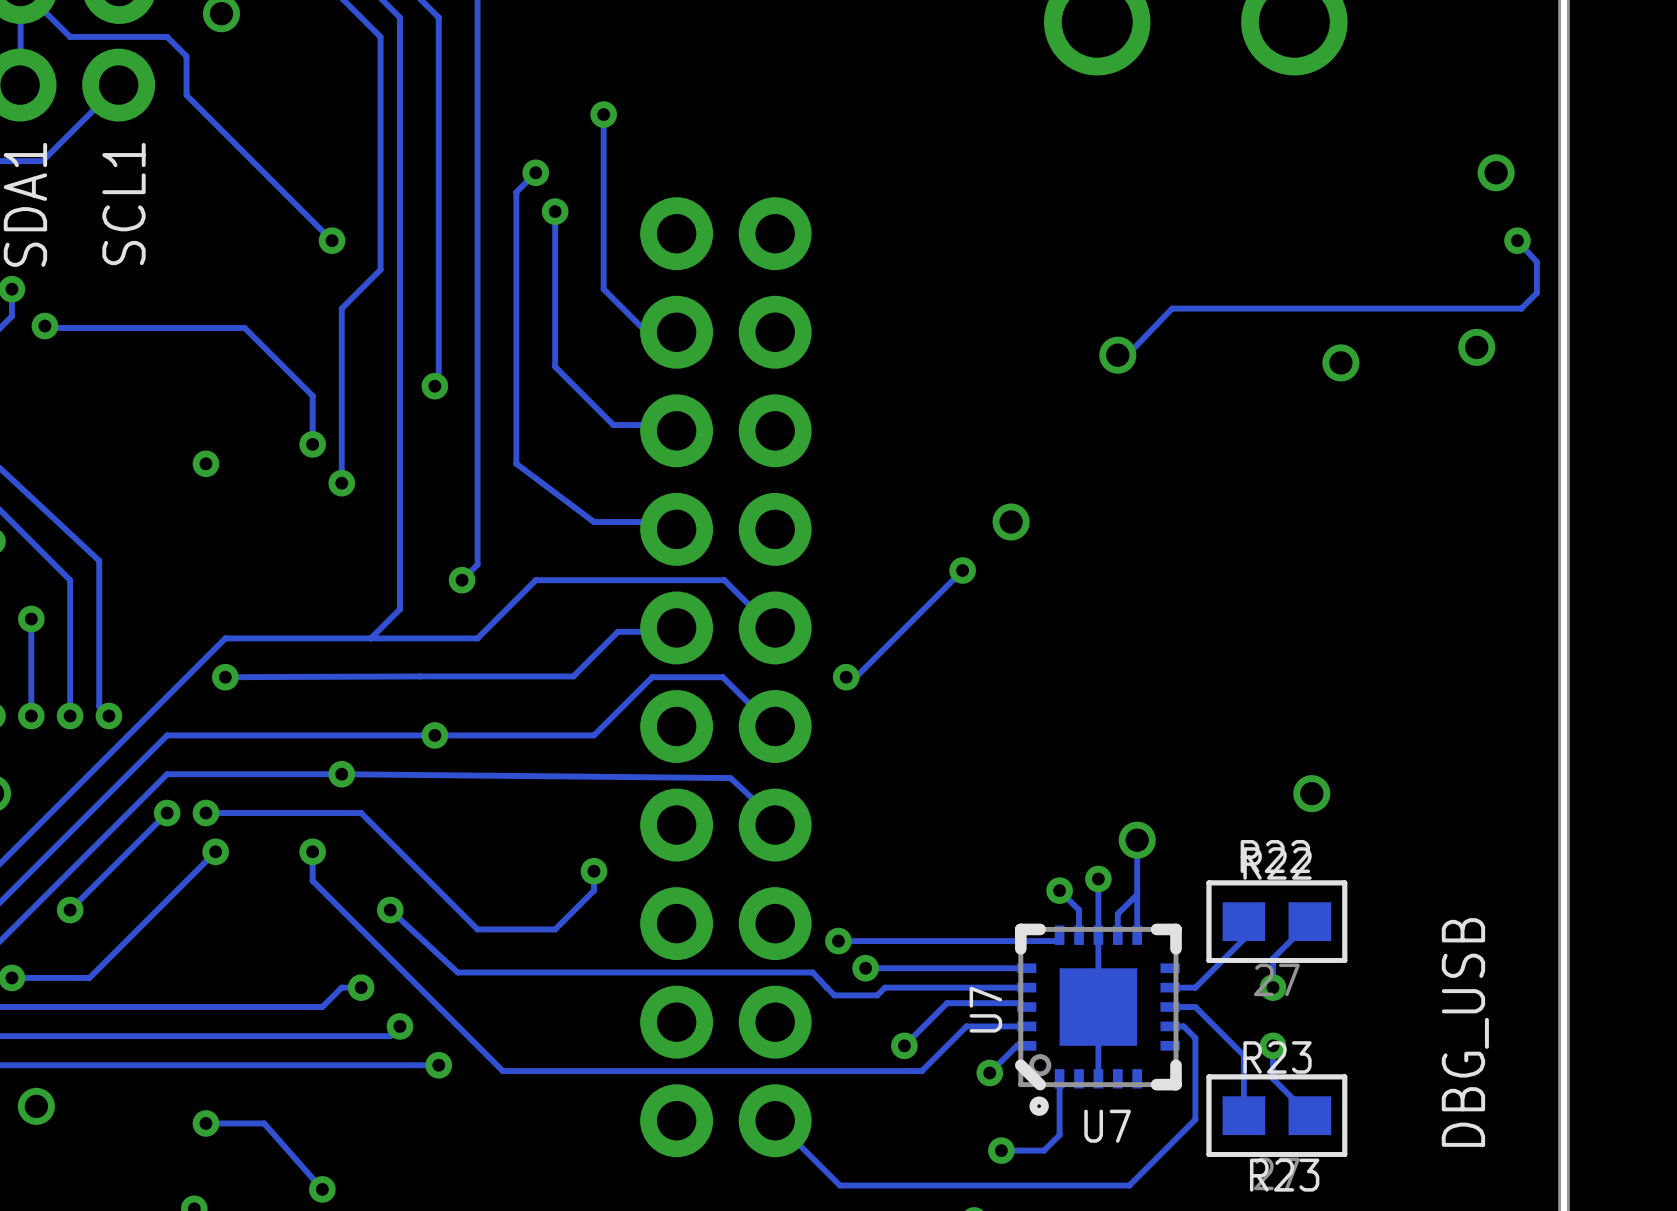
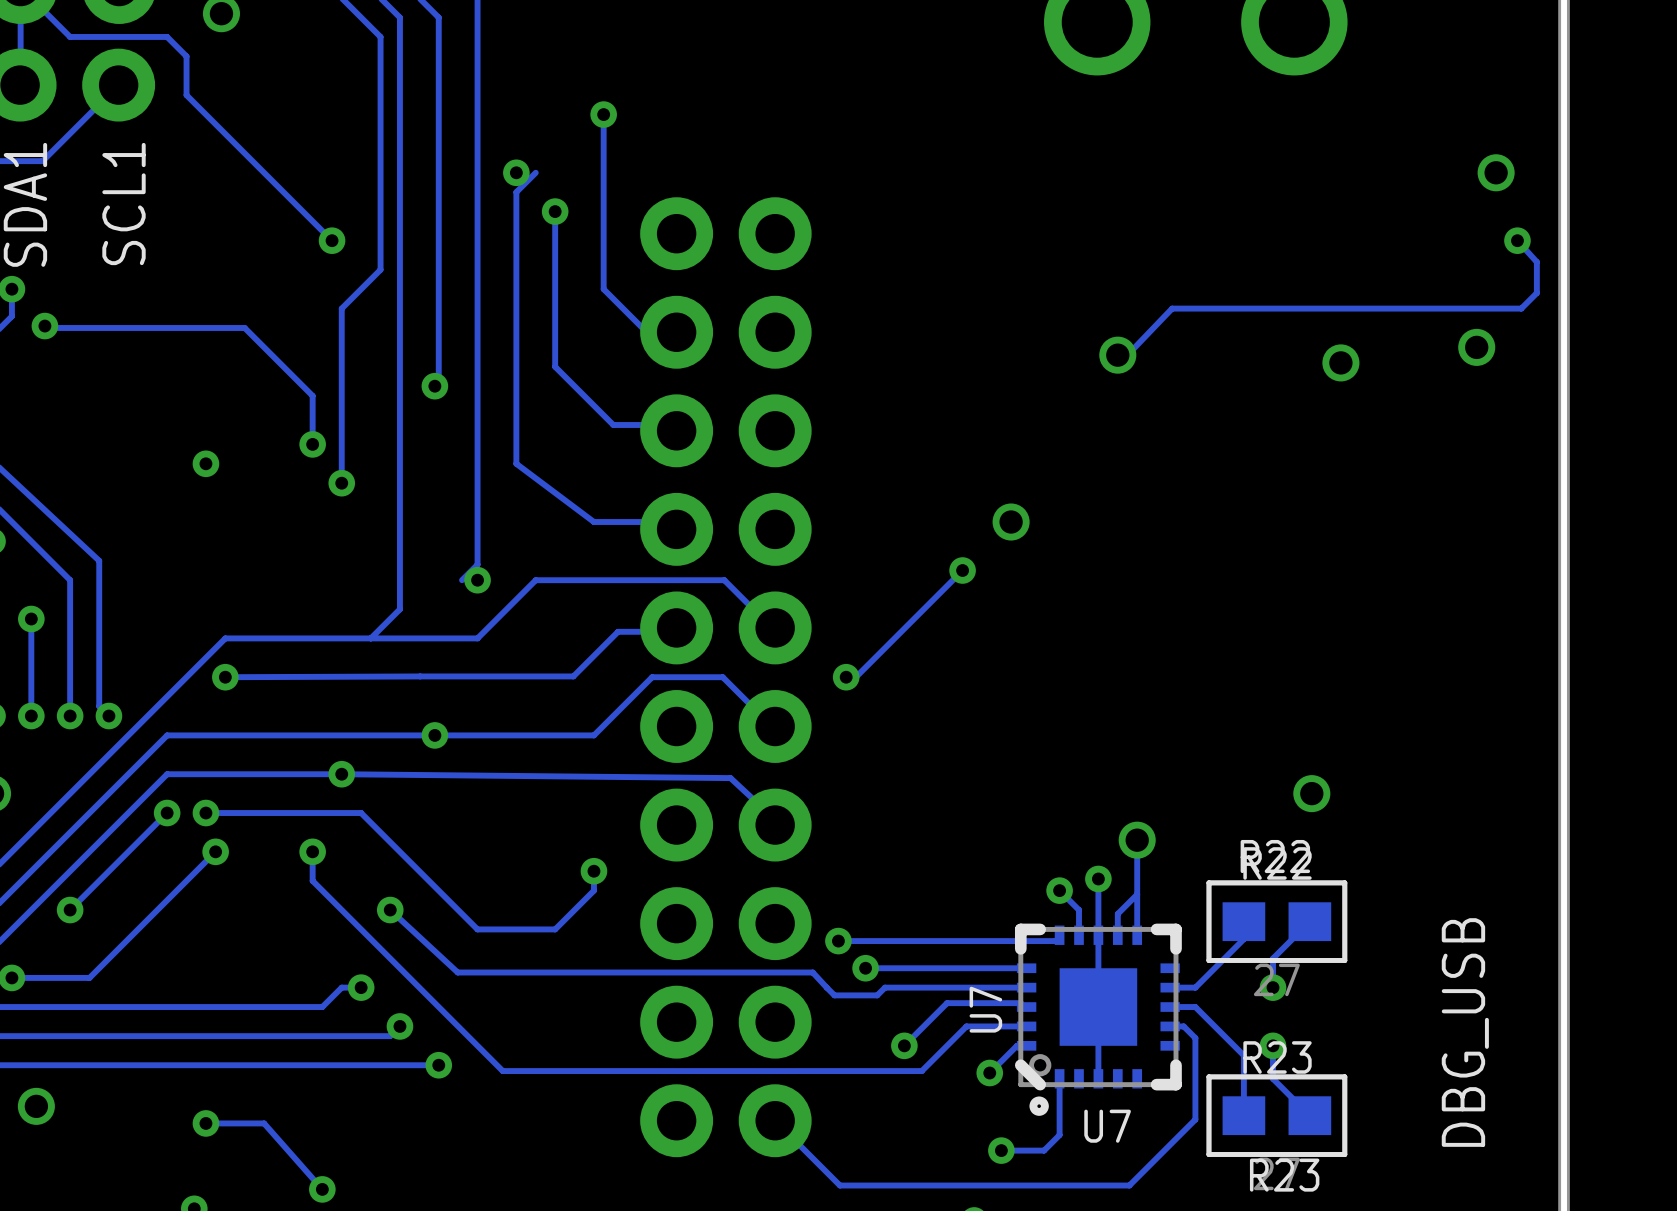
via position: (535, 172) -> (516, 172)
via position: (462, 580) -> (477, 580)

